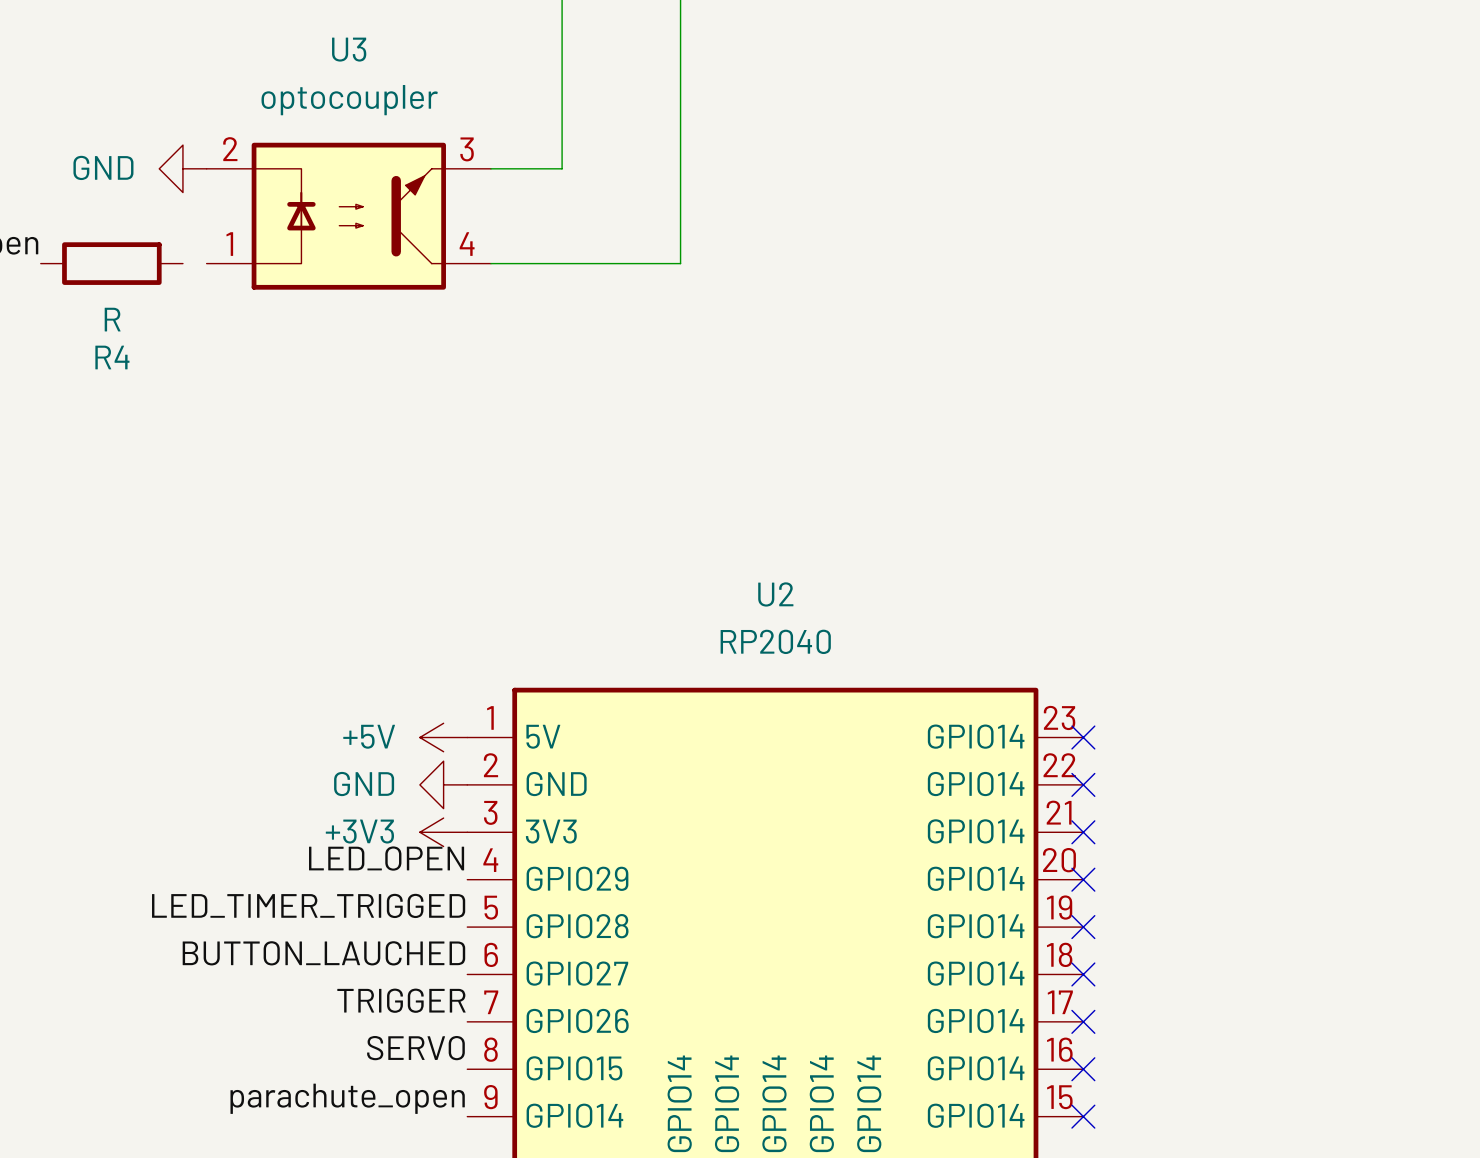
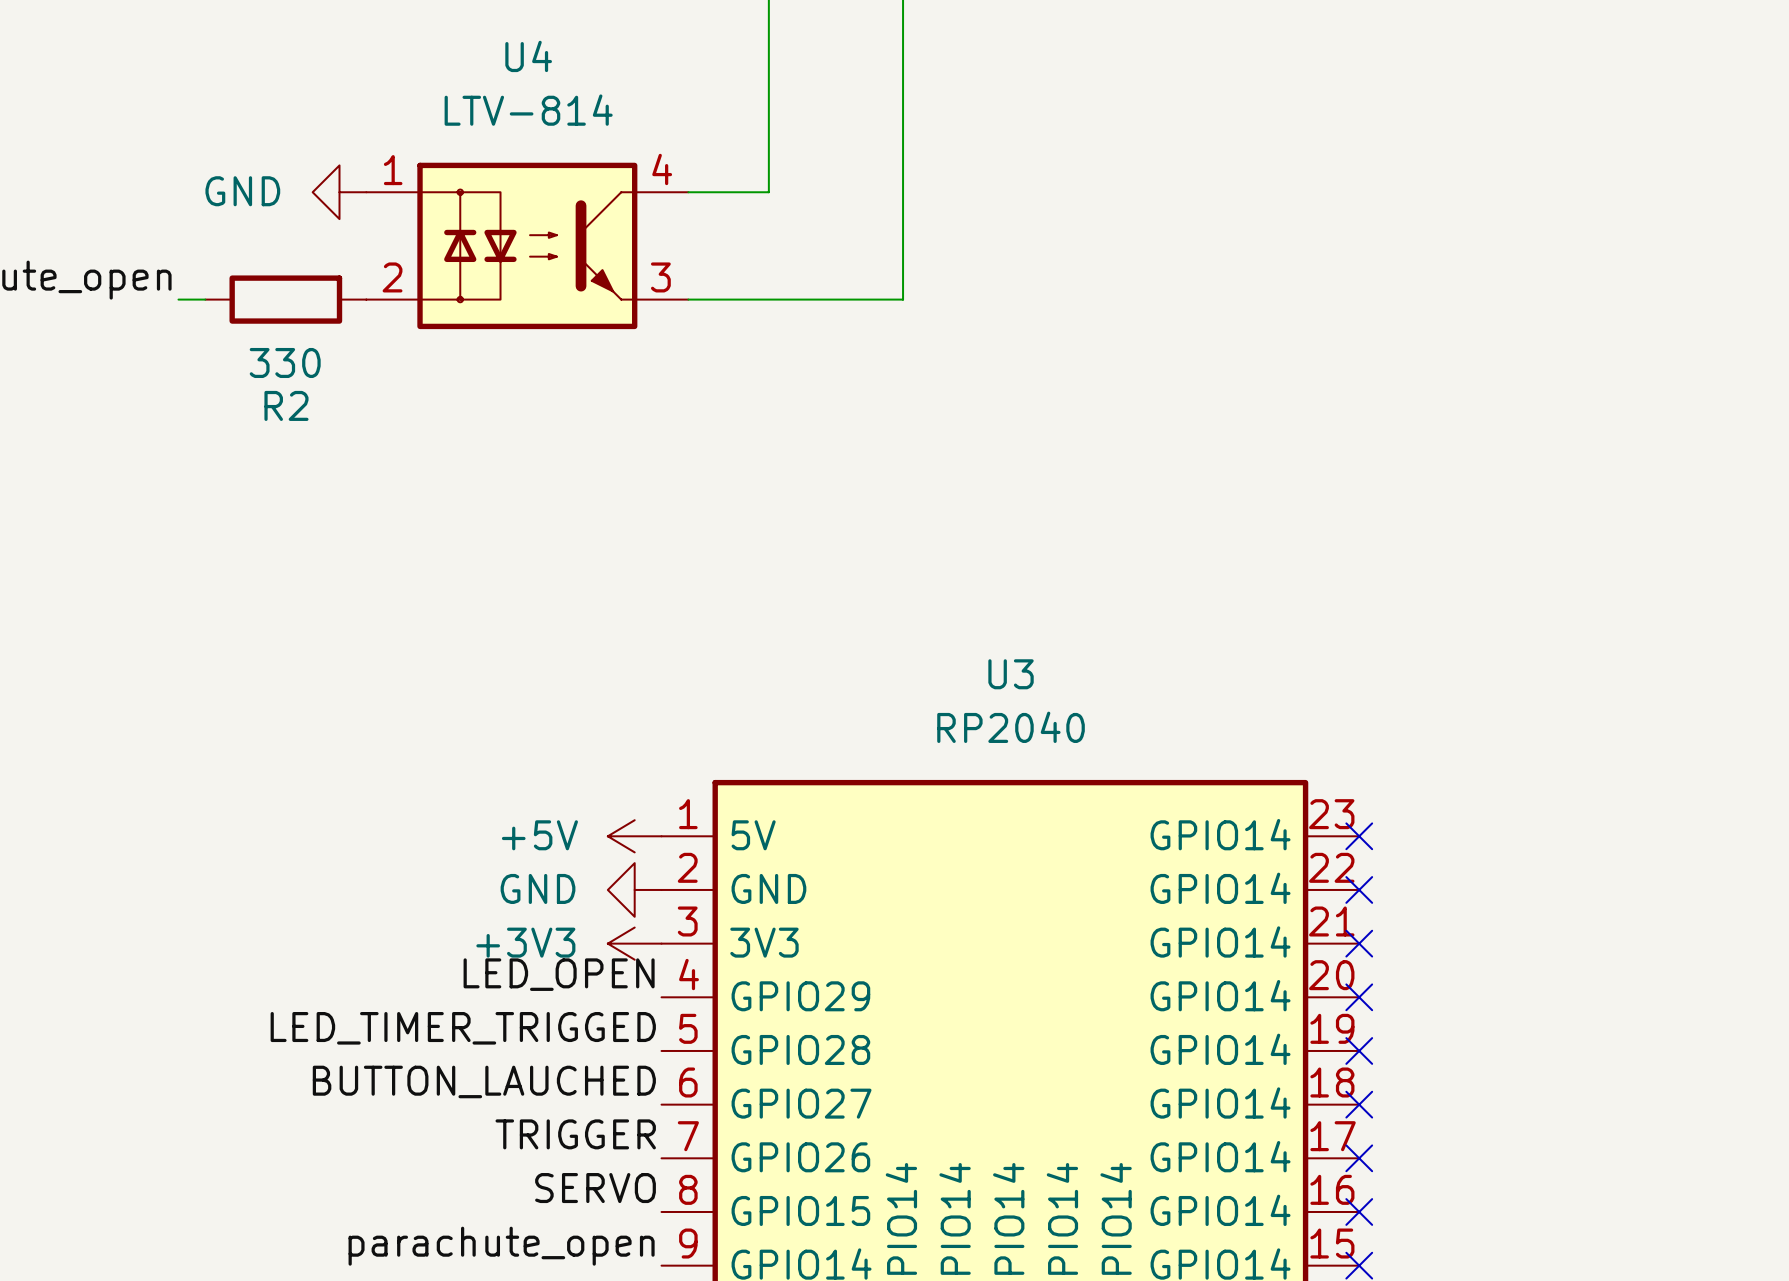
U3: optocoupler (348, 216) -> none
U4: none -> LTV-814 (527, 245)
R4: R (111, 263) -> none
R2: none -> 330 (285, 299)
U2 name: U2 (775, 594) -> U3 (1011, 674)

